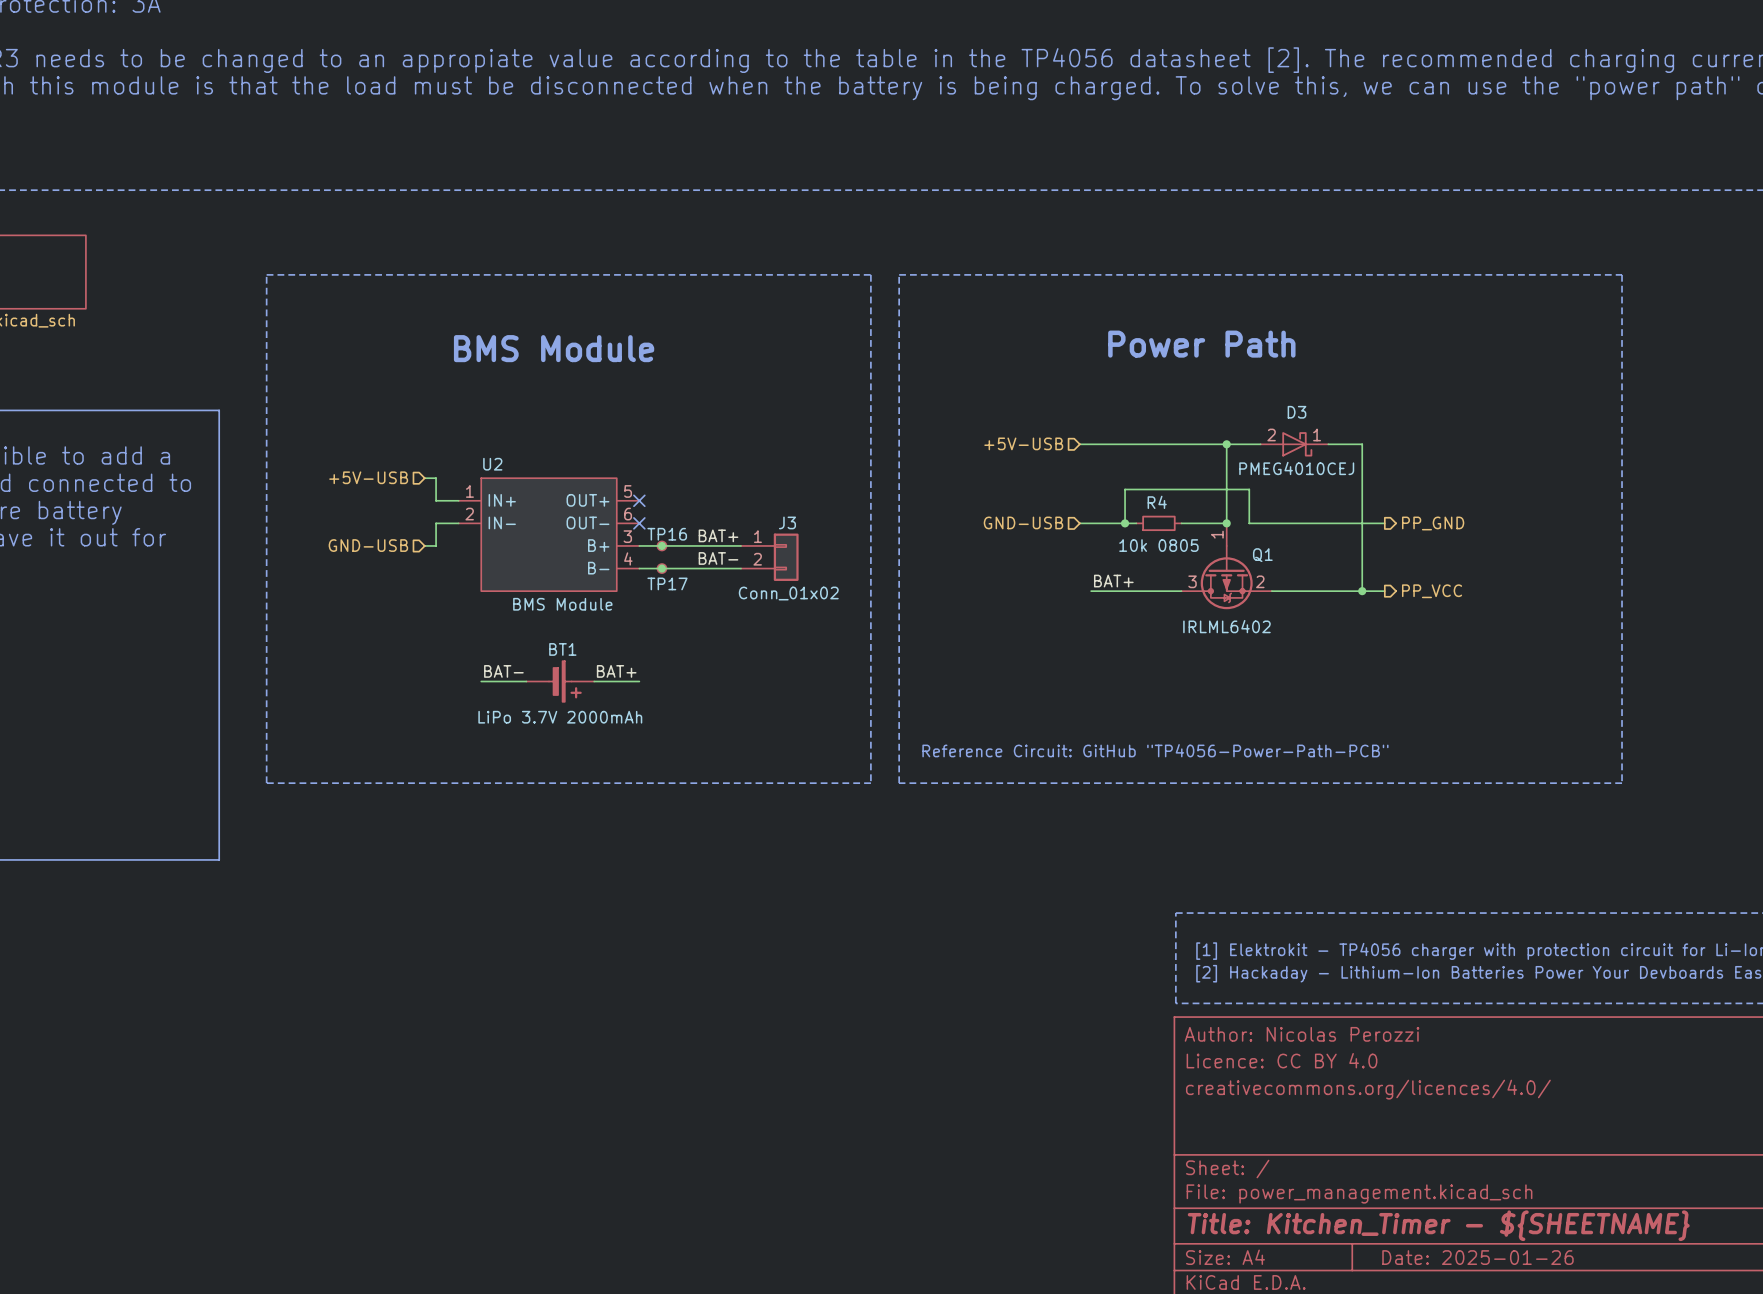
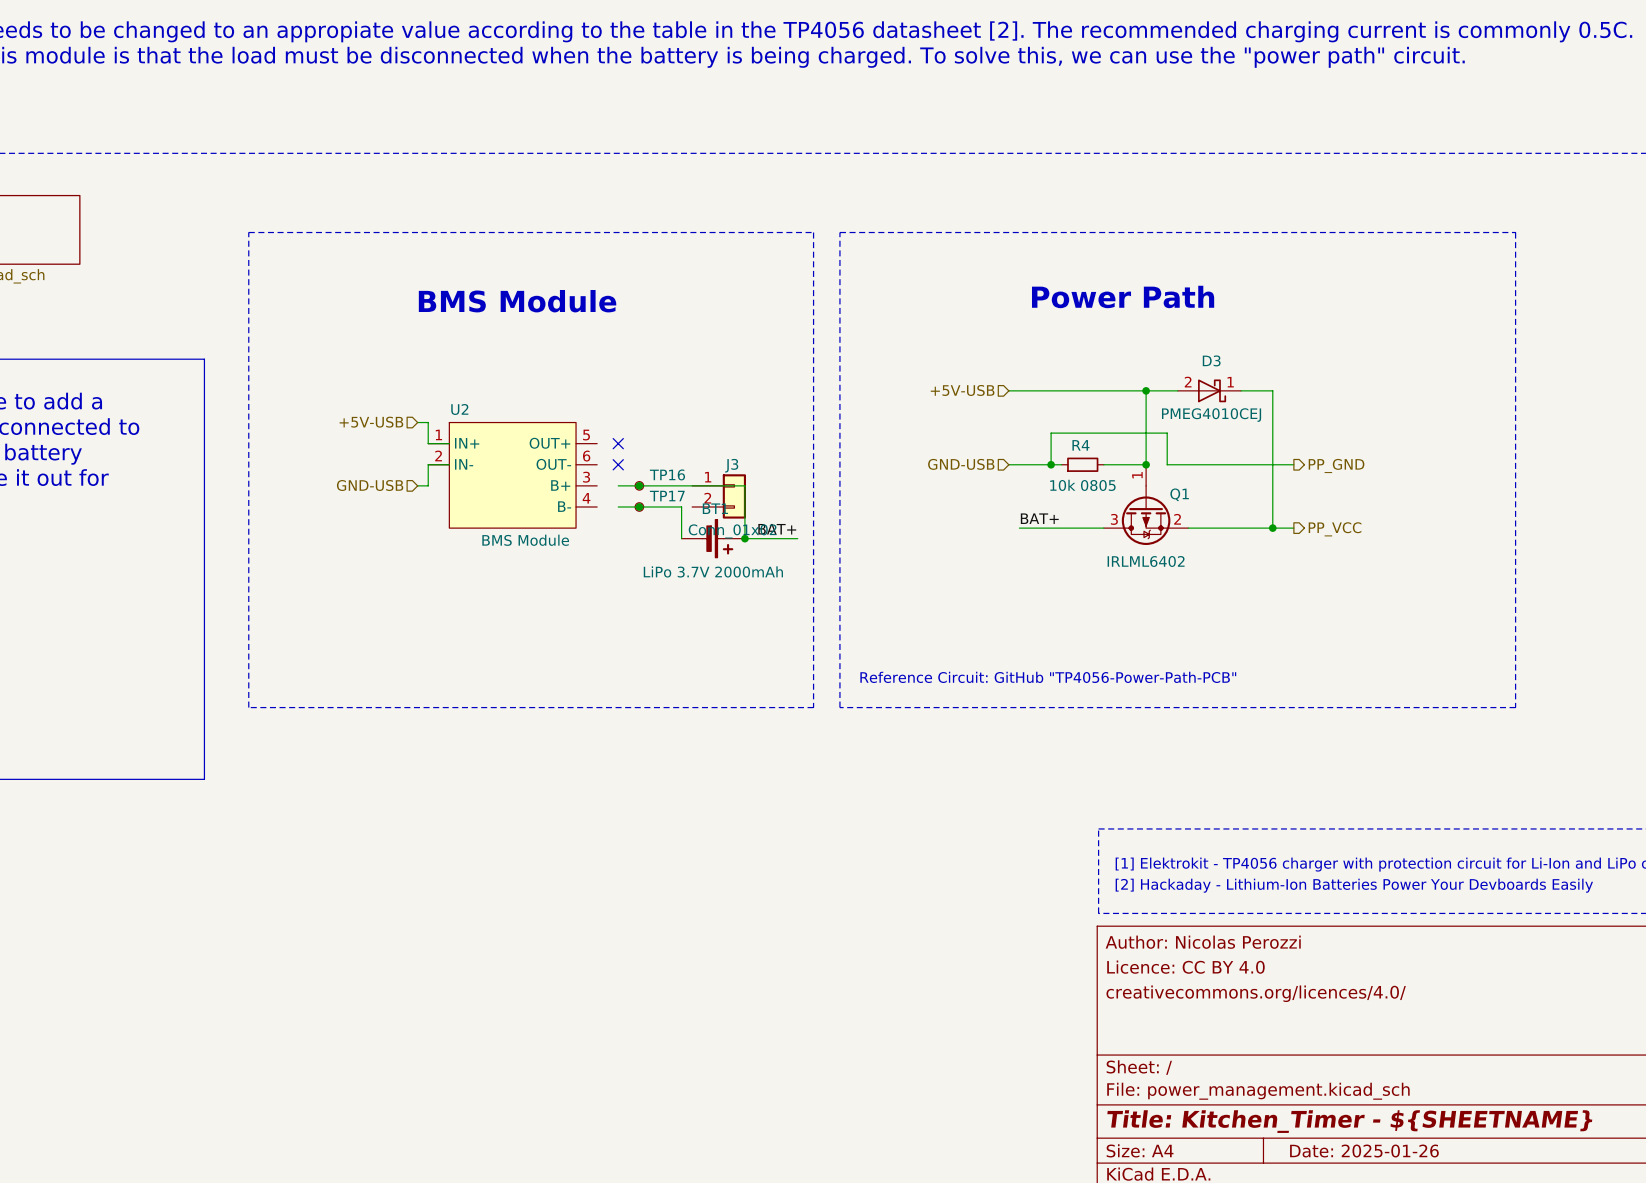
hierarchical label position: +5V-USB (368, 477) -> +5V-USB (371, 422)
wire: (424, 478) (436, 478) (436, 500) (458, 500) -> (417, 422) (428, 422) (428, 443) (449, 443)
no-connect mark: (639, 500) -> none
no-connect mark: none -> (618, 443)
wire: (458, 523) (436, 523) (436, 545) (424, 545) -> (449, 464) (428, 464) (428, 485) (417, 485)
no-connect mark: (639, 523) -> none
no-connect mark: none -> (618, 464)
TP16 name position: TP16 (667, 534) -> TP16 (667, 474)
label: BAT+ (718, 535) -> none
hierarchical label position: GND-USB (368, 545) -> GND-USB (370, 485)
wire: (639, 545) (661, 545) -> none
junction: (661, 545) -> none
TP16 position: (661, 545) -> (639, 485)
junction: none -> (639, 485)
wire: none -> (692, 485) (744, 485) (744, 538) (797, 538)
label: BAT- (718, 558) -> none
wire: (639, 568) (661, 568) -> none
junction: (661, 568) -> none
TP17 position: (661, 568) -> (639, 506)
junction: none -> (639, 506)
wire: (729, 568) (741, 568) -> (681, 506) (681, 538)
TP17 name position: TP17 (667, 583) -> TP17 (667, 496)
label: none -> BAT+ (777, 529)
junction: none -> (744, 538)
label: BAT- (503, 671) -> none
label: BAT+ (616, 671) -> none
wire: (481, 681) (526, 681) -> none
BT1 position: (560, 681) -> (713, 538)
wire: (594, 681) (639, 681) -> none

